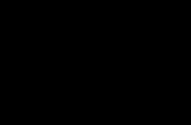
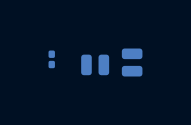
part: none -> (51, 59)
part: none -> (132, 62)
part: none -> (95, 64)

